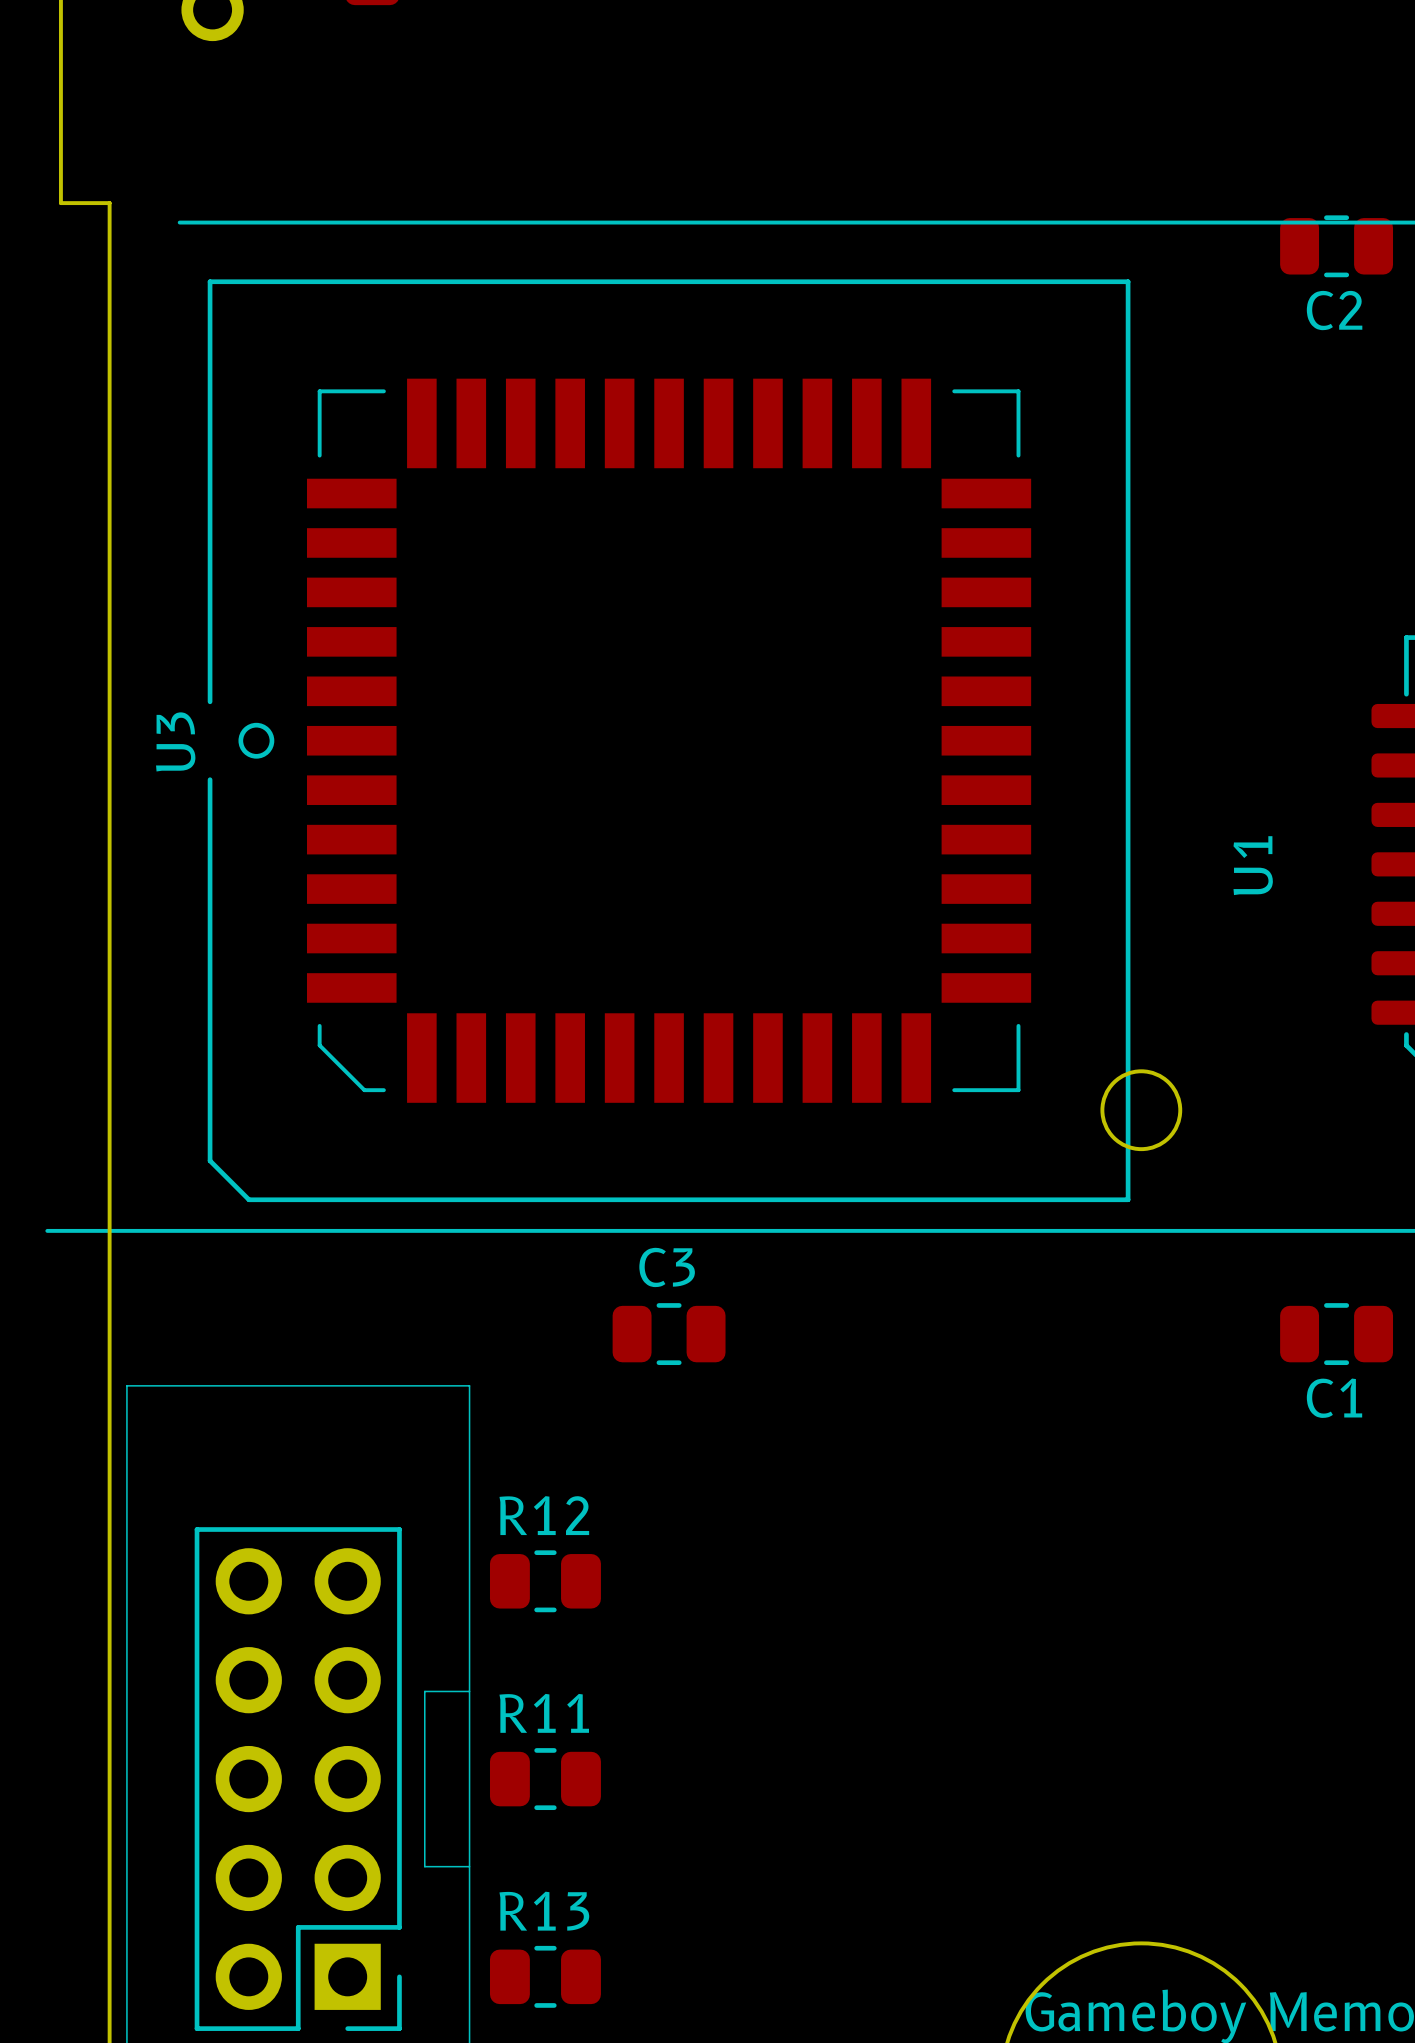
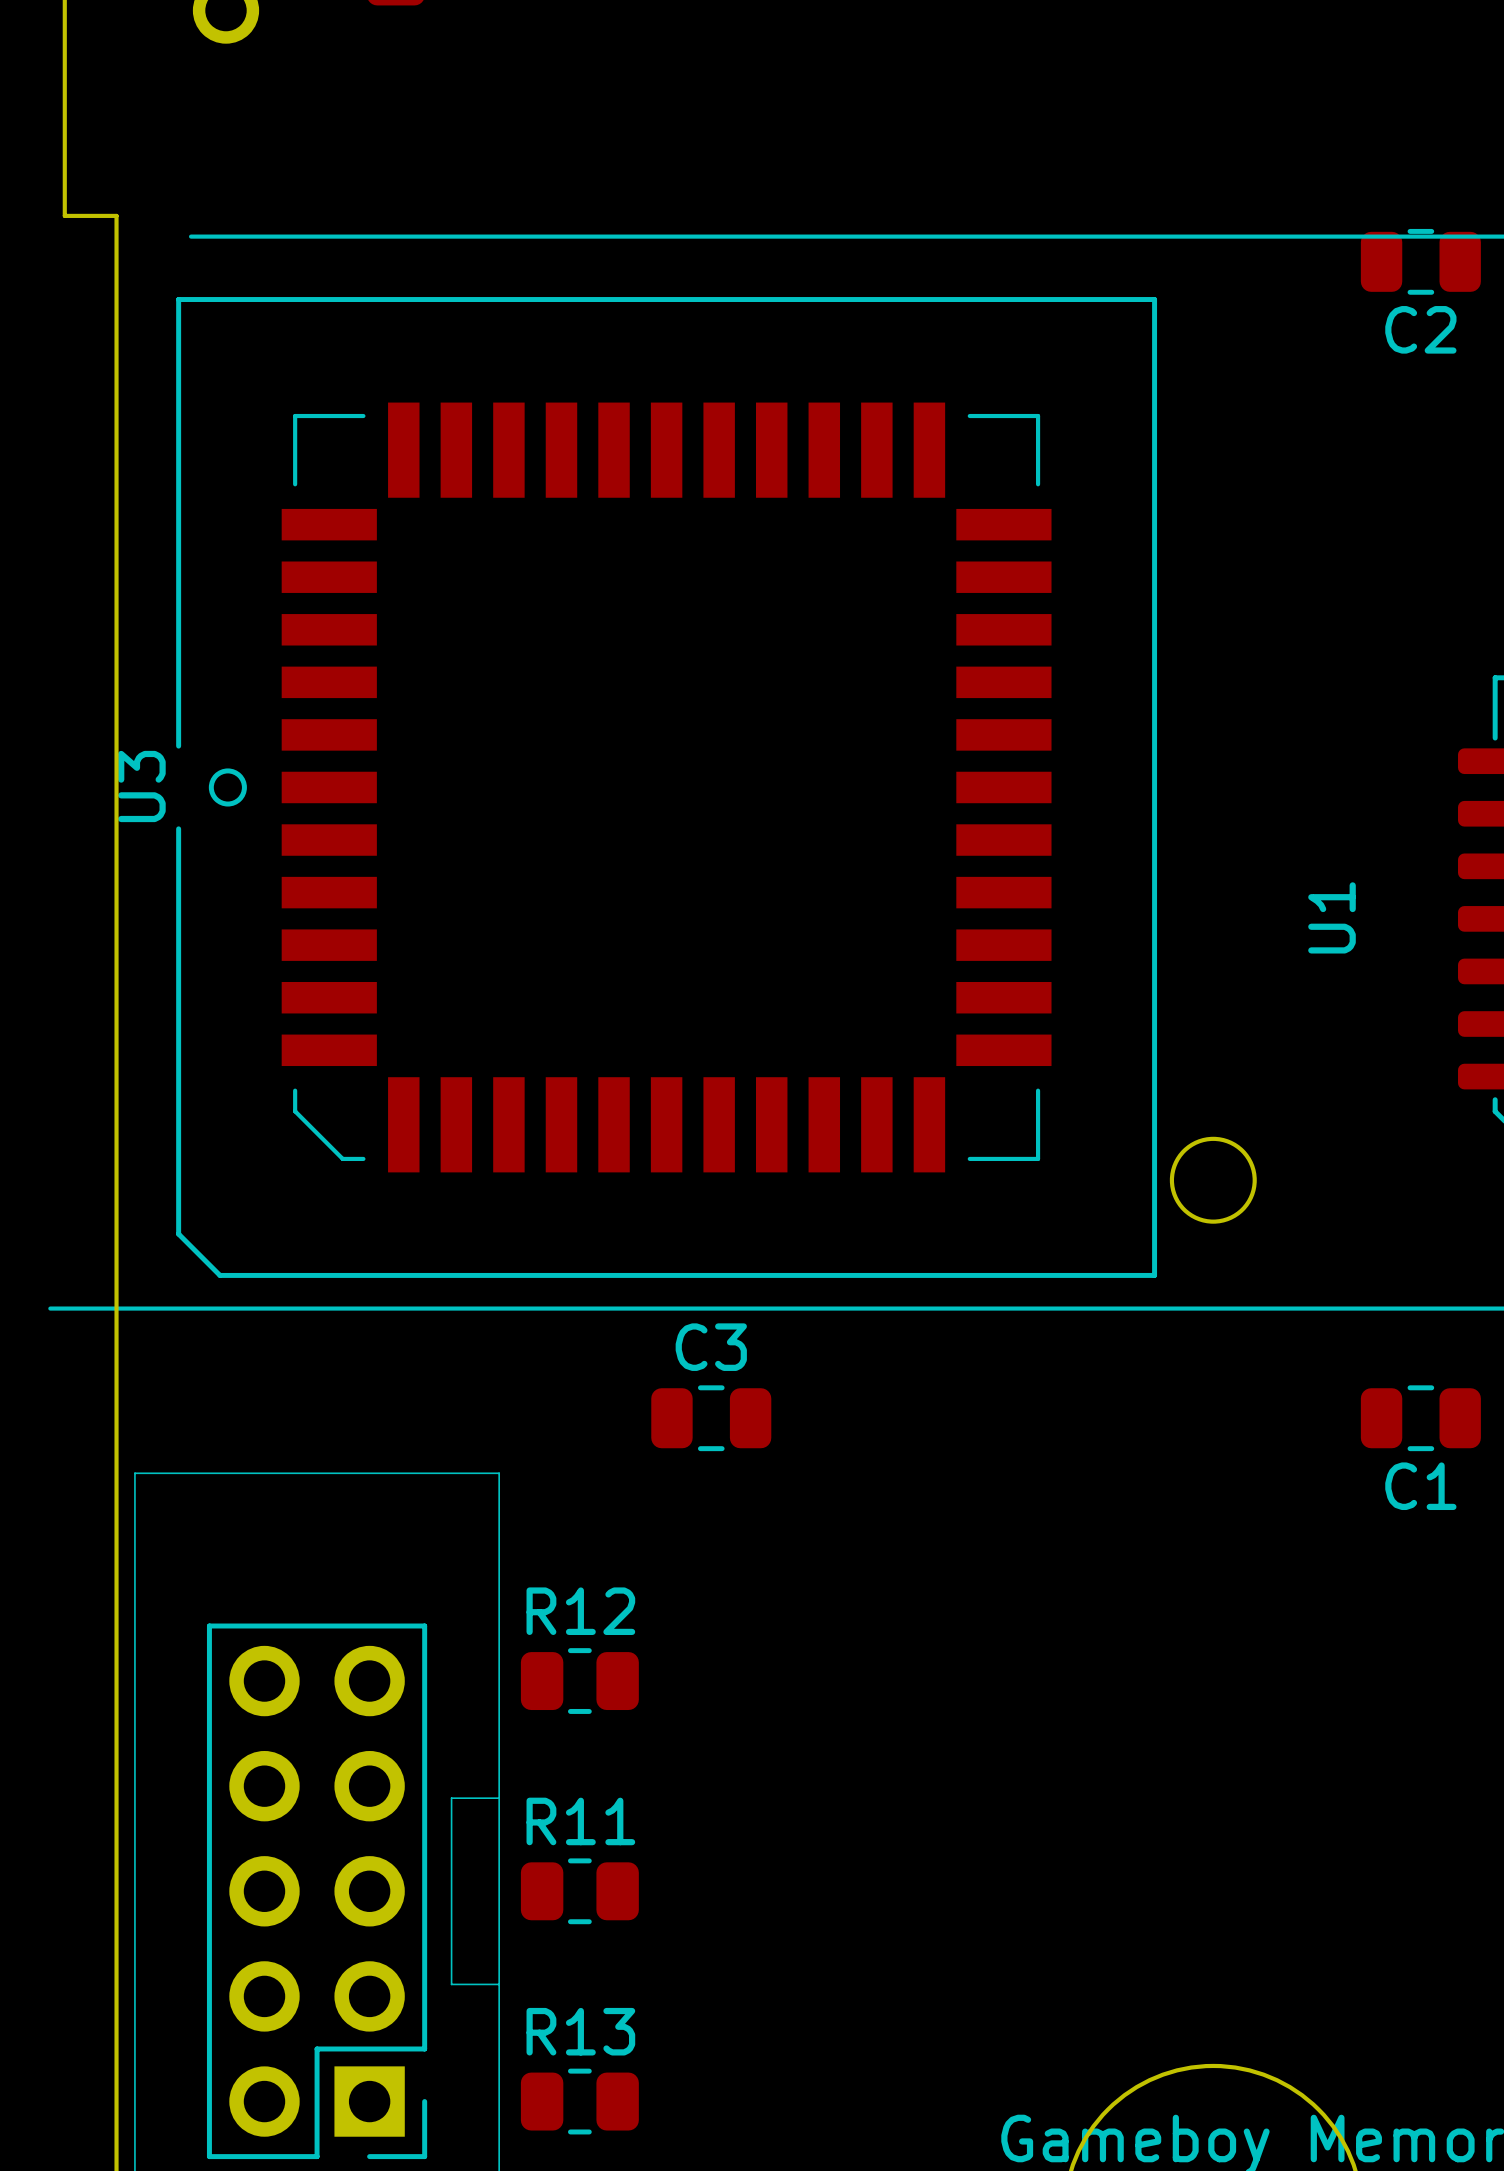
U3 position: (669, 740) -> (666, 787)

